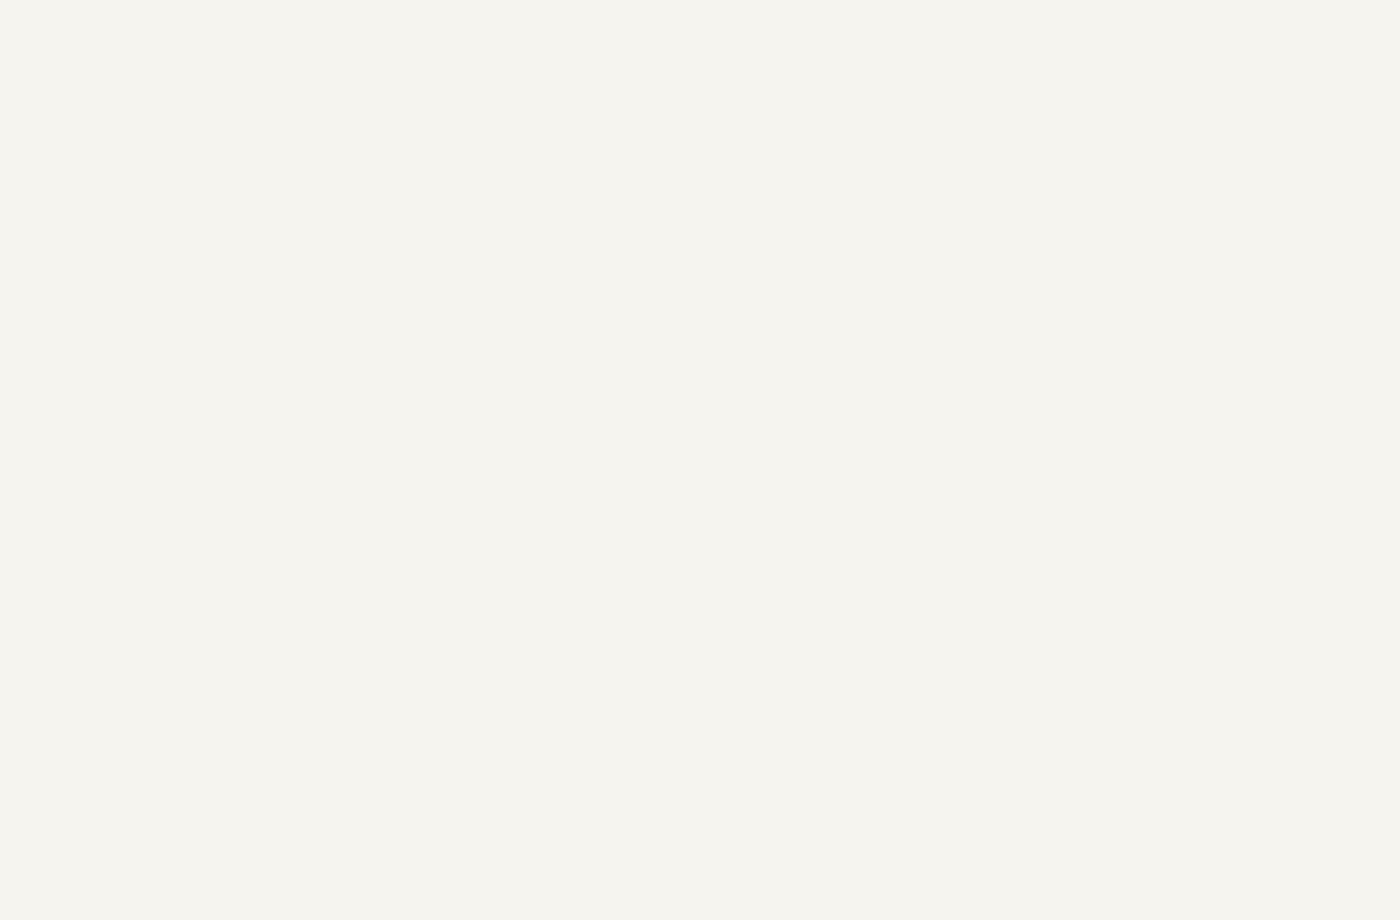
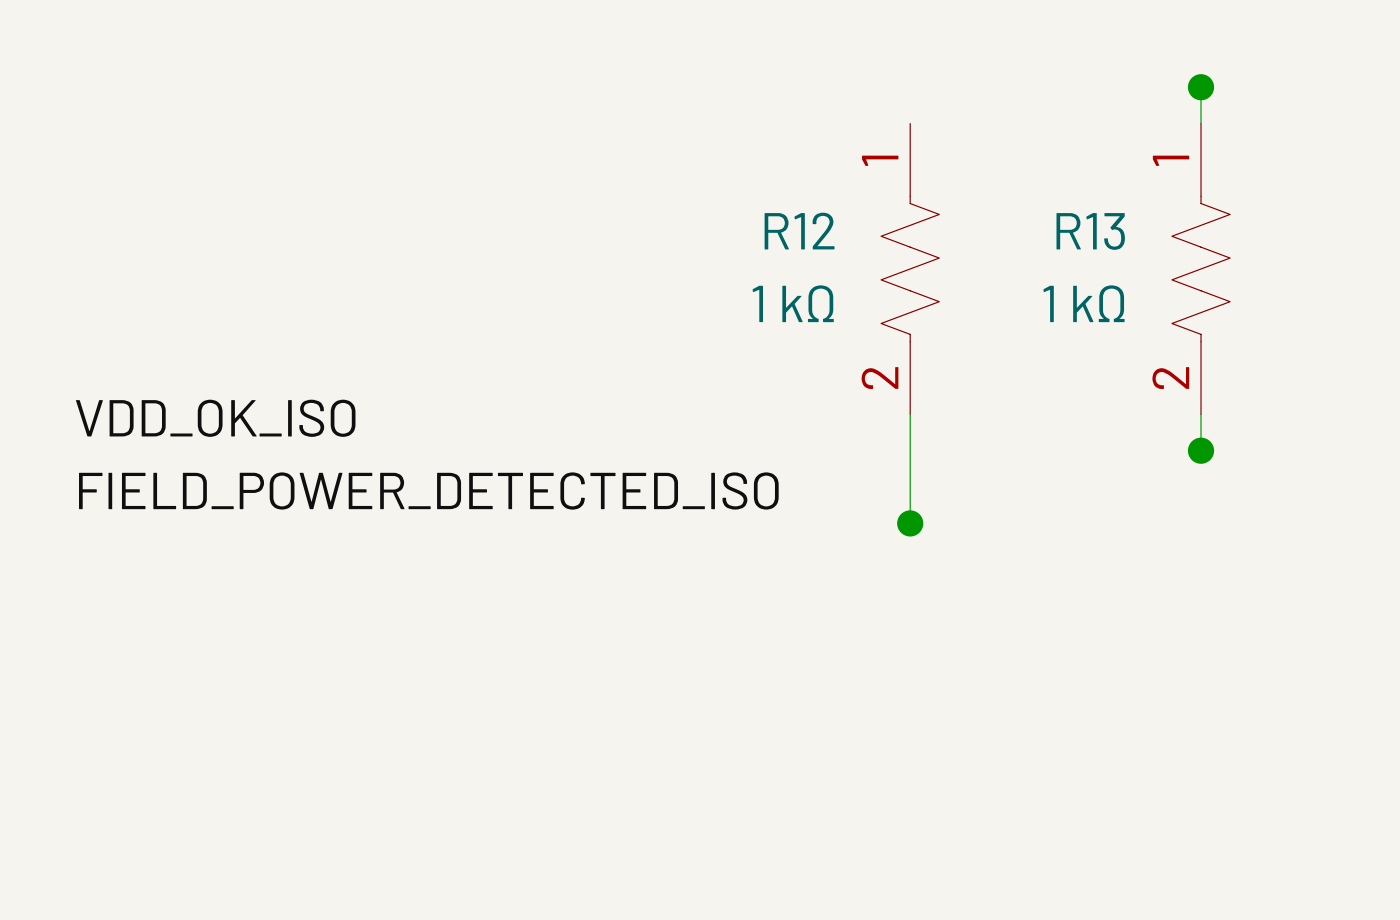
wire: none -> (1201, 87) (1201, 123)
junction: none -> (1201, 87)
R12: none -> 1 kΩ (910, 268)
R13: none -> 1 kΩ (1201, 268)
wire: none -> (910, 414) (910, 523)
wire: none -> (1201, 414) (1201, 450)
label: none -> VDD_OK_ISO (215, 418)
junction: none -> (1201, 450)
label: none -> FIELD_POWER_DETECTED_ISO (428, 491)
junction: none -> (910, 523)

